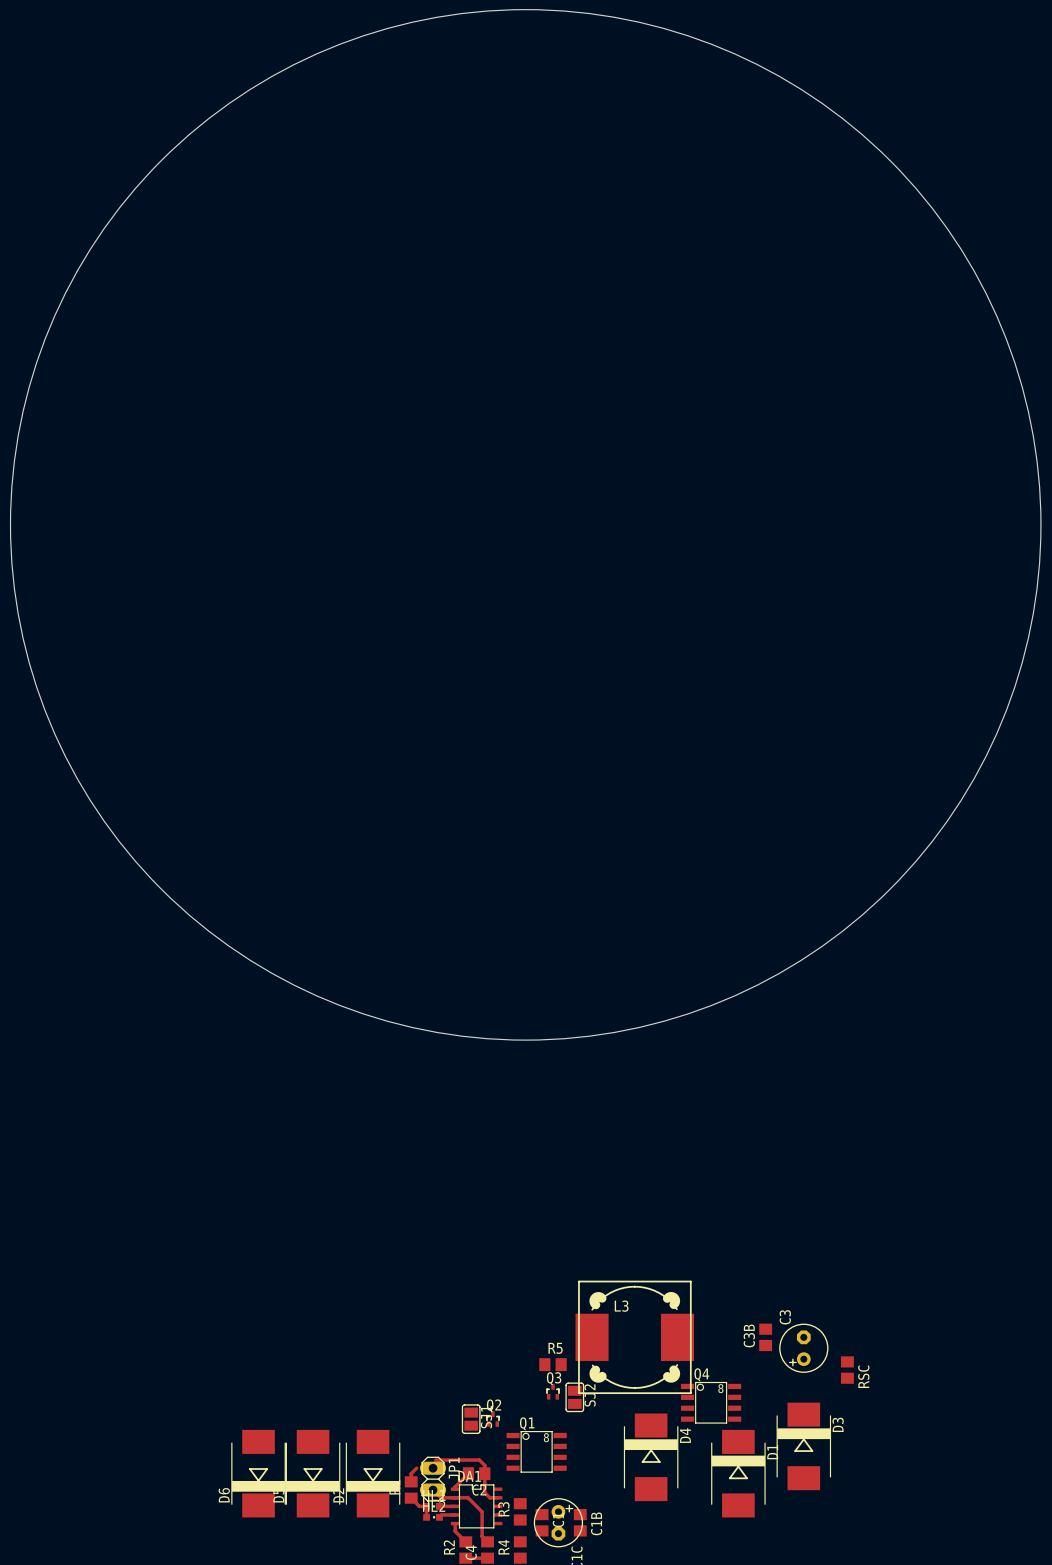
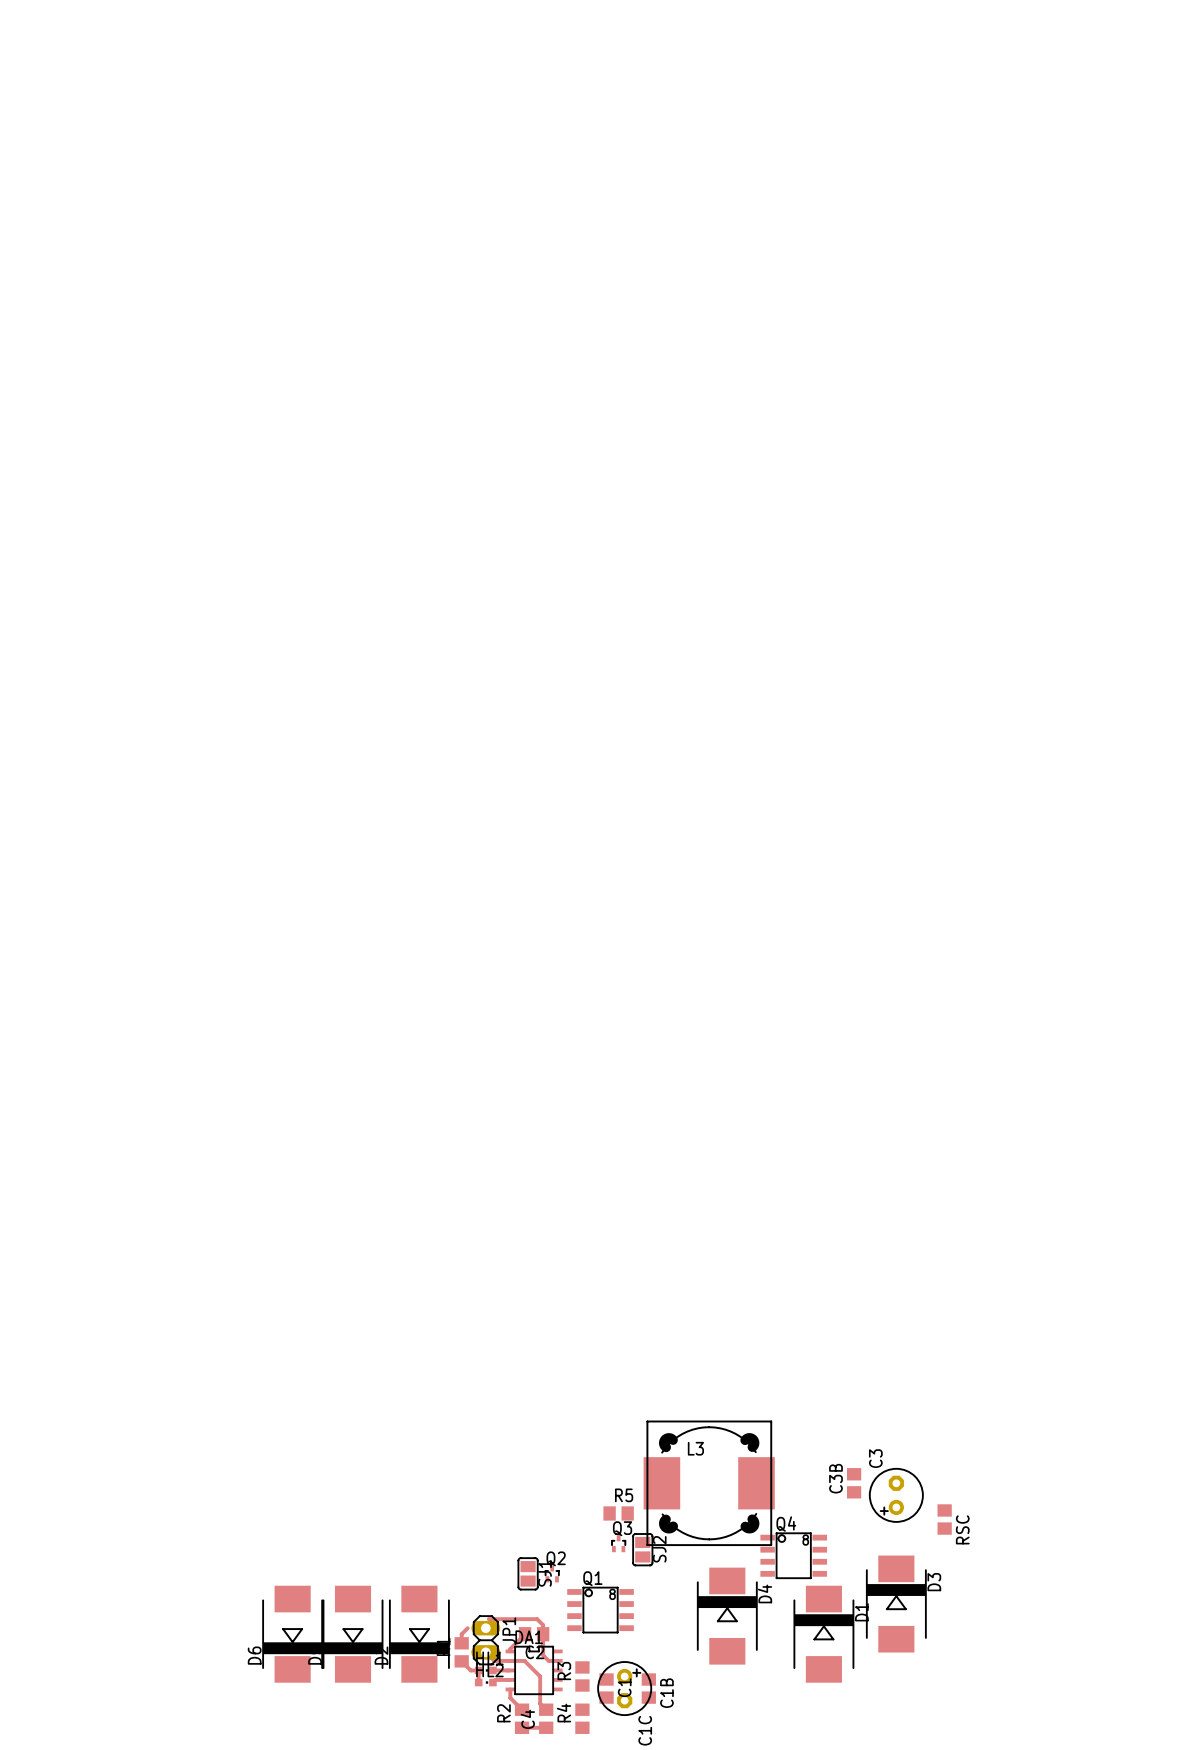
drawing: [9, 9, 1042, 1041] -> none

